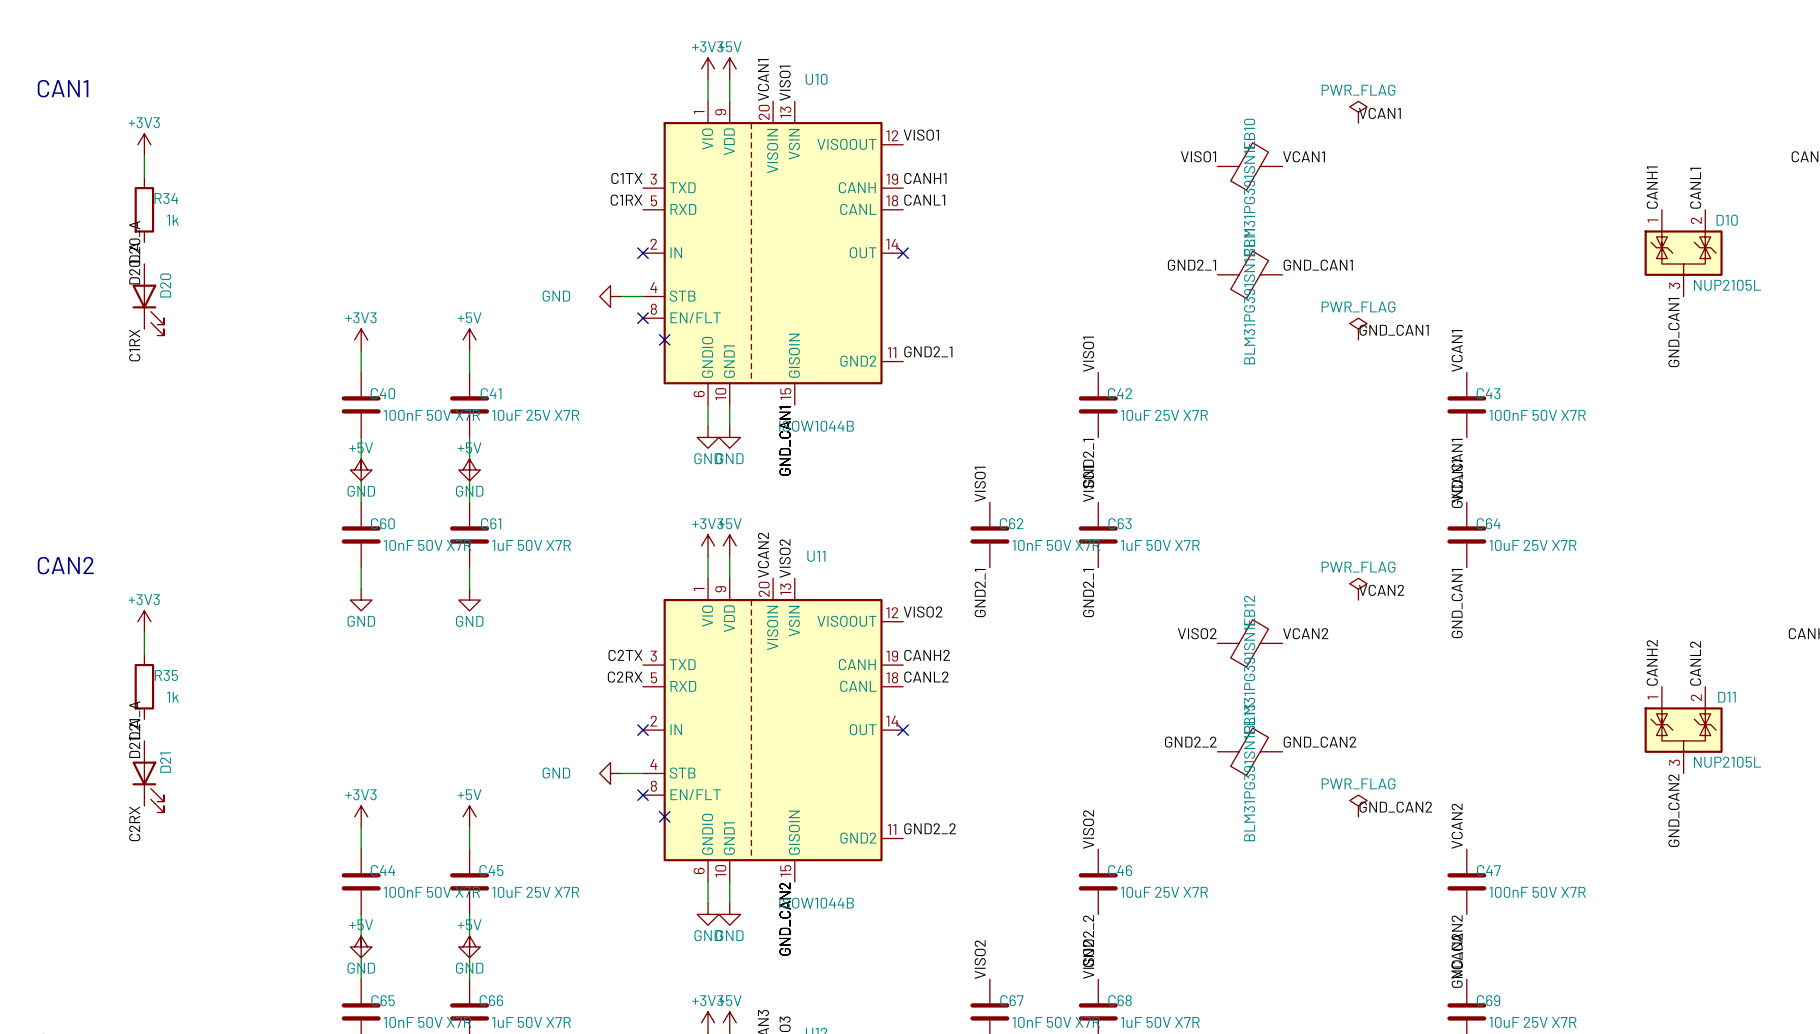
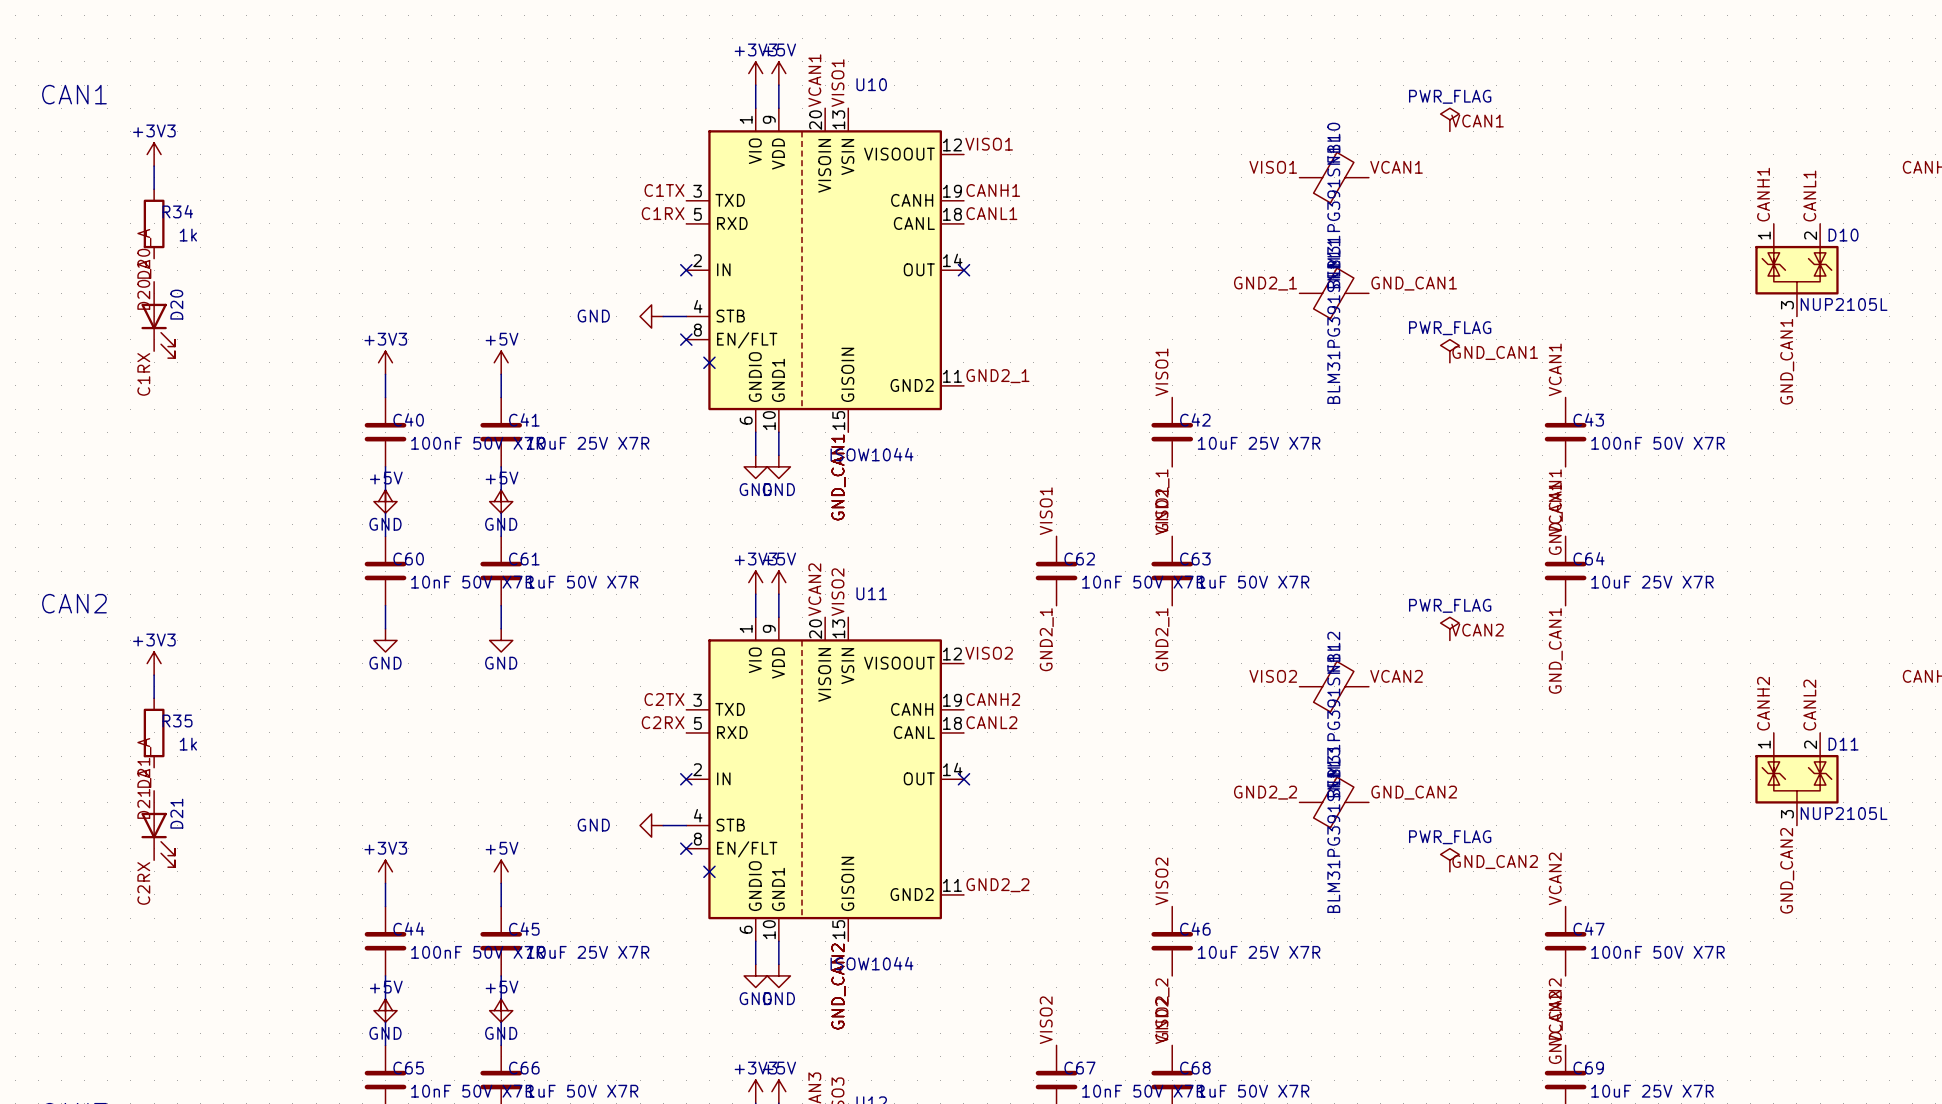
U10 value: ISOW1044B (816, 426) -> ISOW1044 (871, 454)
U11 value: ISOW1044B (816, 903) -> ISOW1044 (871, 963)

